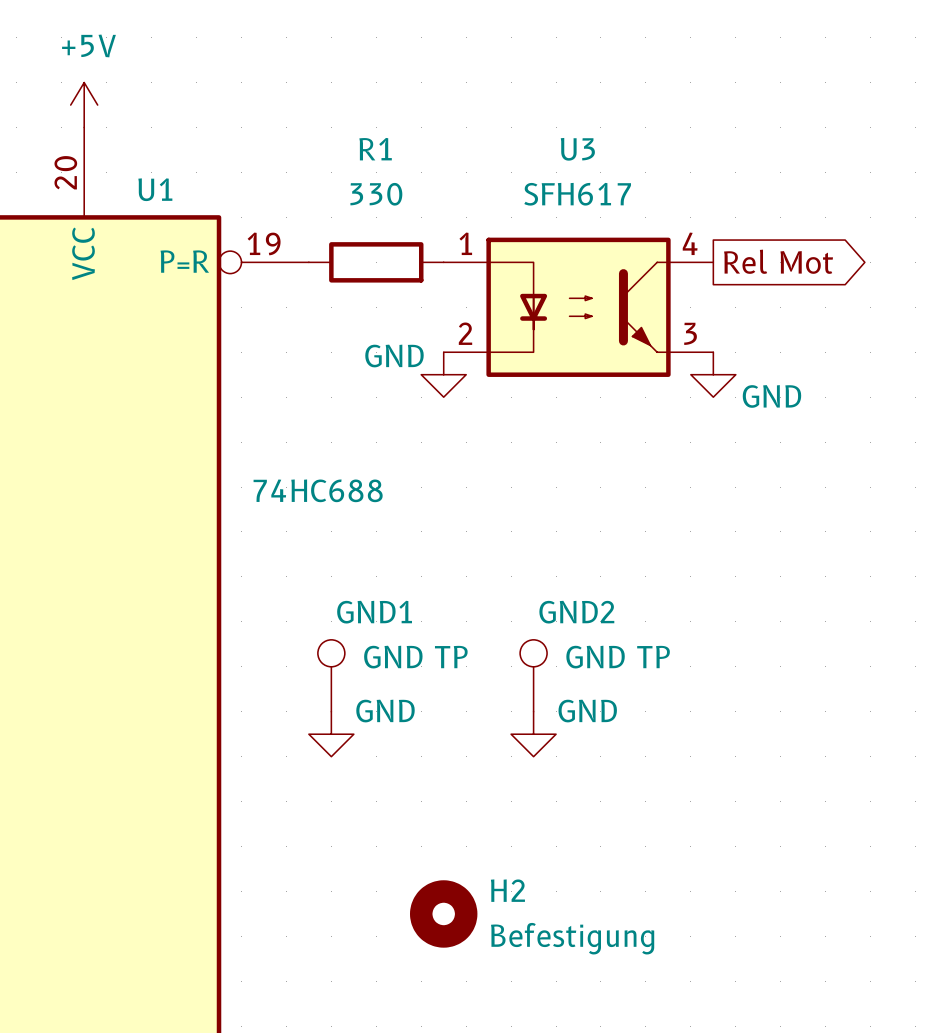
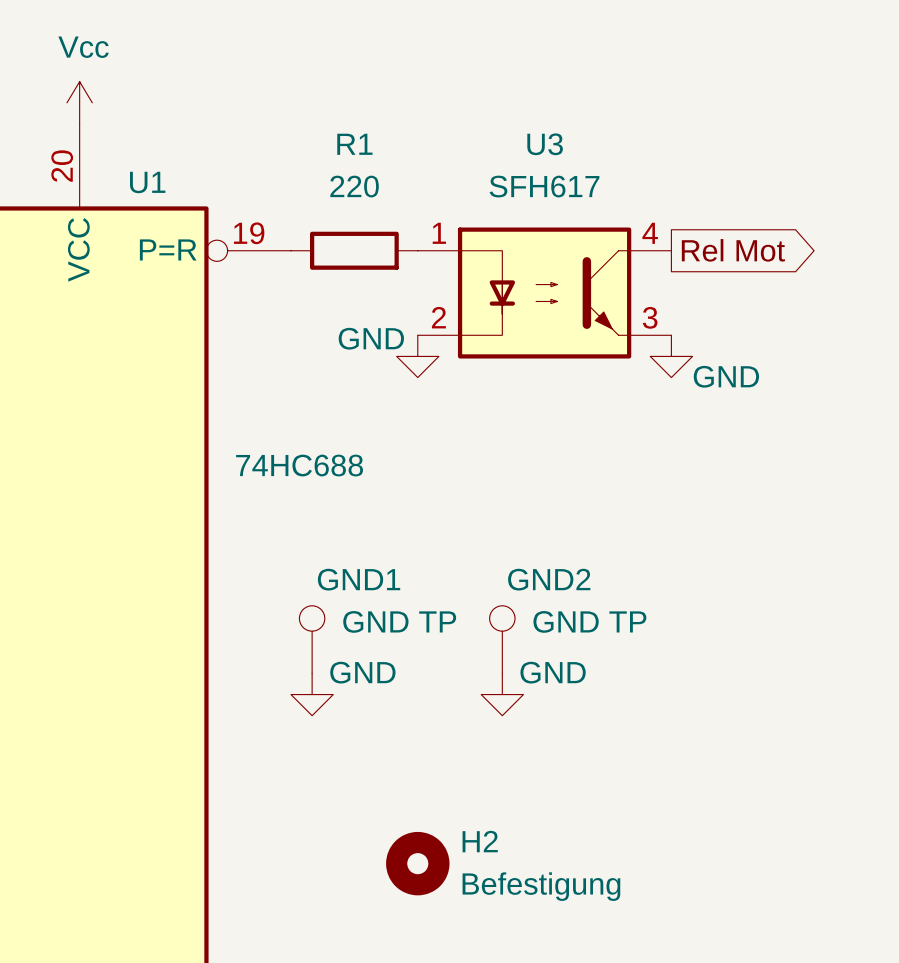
power symbol: +5V (84, 105) -> Vcc (79, 102)
R1 value: 330 (376, 194) -> 220 (354, 186)

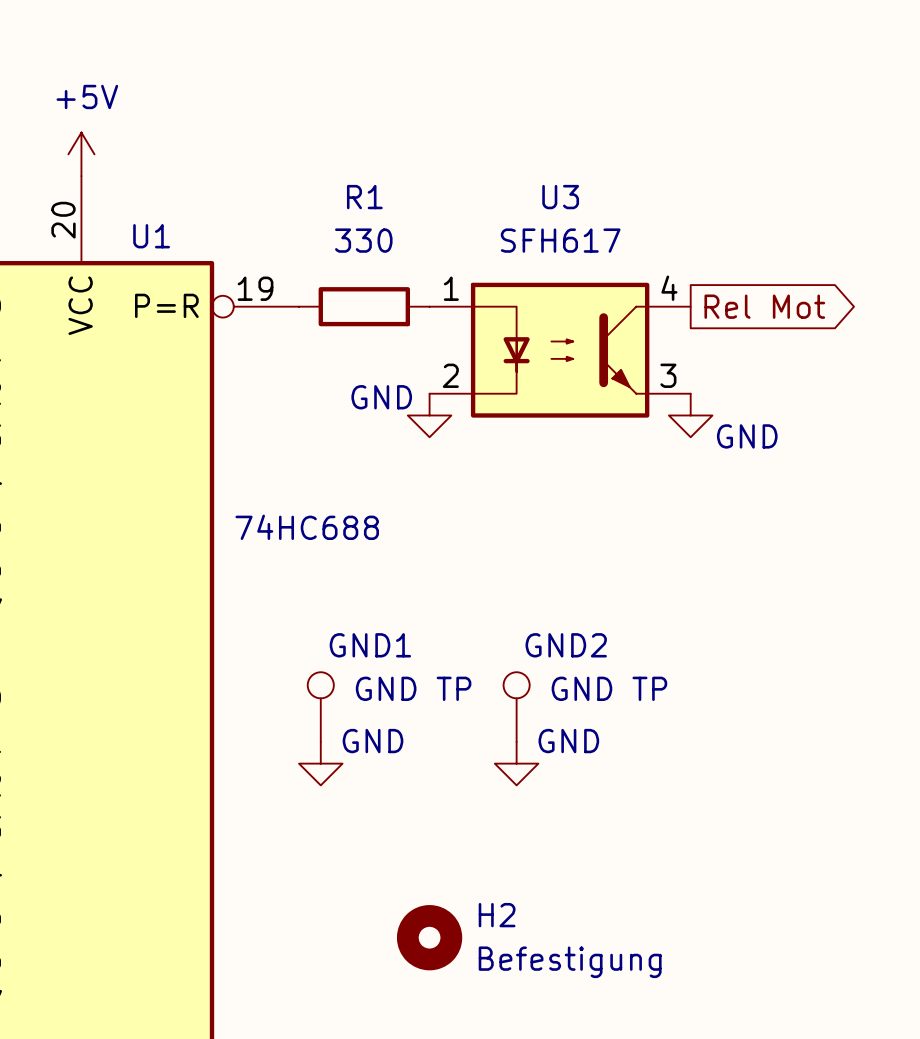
power symbol: Vcc (79, 102) -> +5V (81, 154)
R1 value: 220 (354, 186) -> 330 (363, 240)

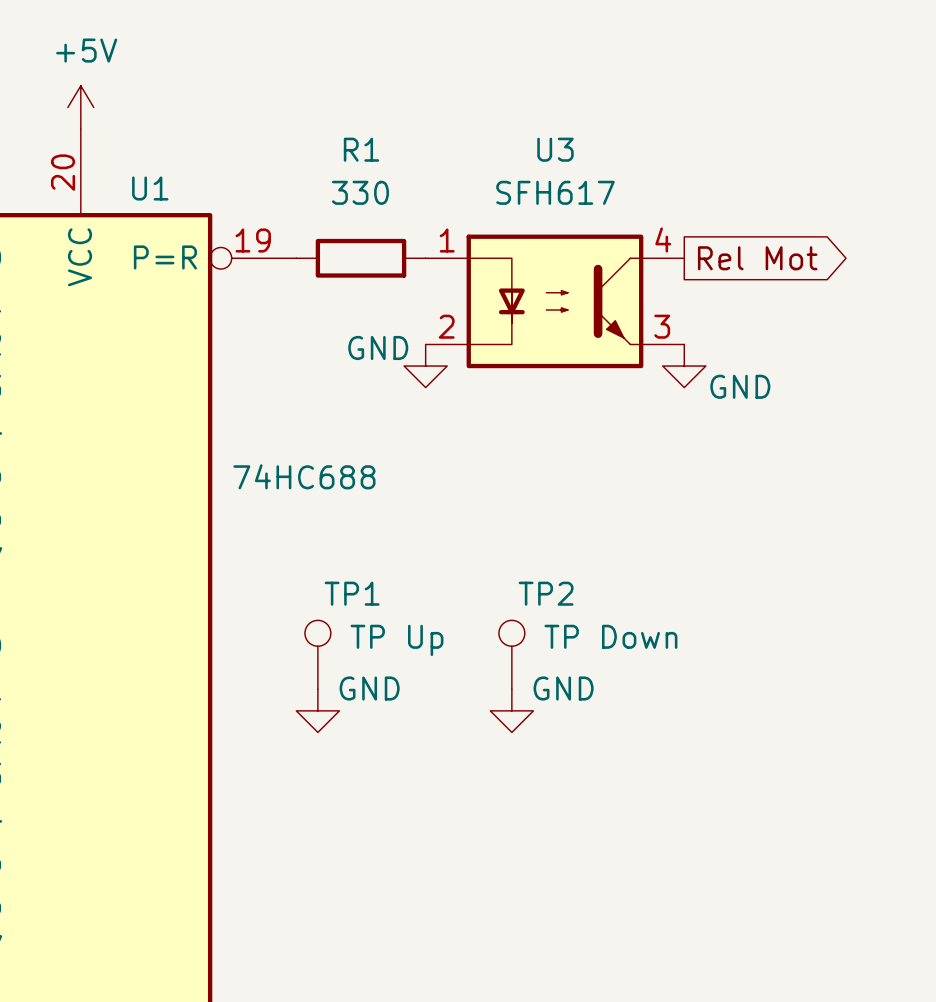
GND1 name: GND1 (370, 645) -> TP1 (352, 593)
GND2 name: GND2 (566, 645) -> TP2 (546, 593)
GND1 value: GND TP (413, 688) -> TP Up (396, 640)
GND2 value: GND TP (609, 688) -> TP Down (610, 636)
H2: Befestigung (429, 937) -> none

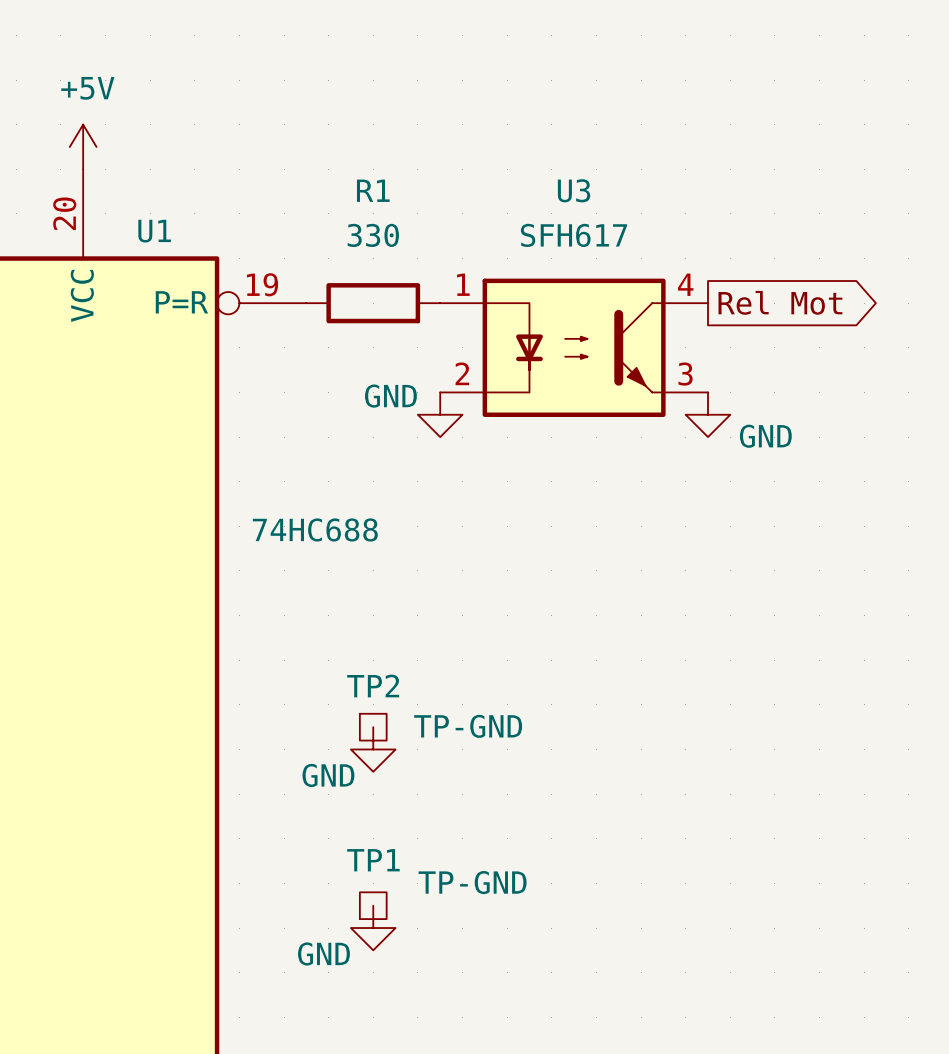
TP1 name position: TP1 (352, 593) -> TP1 (373, 860)
TP2 name position: TP2 (546, 593) -> TP2 (373, 685)
TP1 symbol: [304, 620, 331, 690] -> [359, 892, 387, 920]
TP2 symbol: [498, 620, 525, 690] -> [359, 713, 387, 741]
TP2 value: TP Down (610, 636) -> TP-GND (468, 726)
TP1 value: TP Up (396, 640) -> TP-GND (472, 882)
power symbol text position: GND (369, 688) -> GND (328, 775)
power symbol position: GND (317, 710) -> GND (373, 749)
power symbol: GND (511, 710) -> none
power symbol: none -> GND (373, 928)

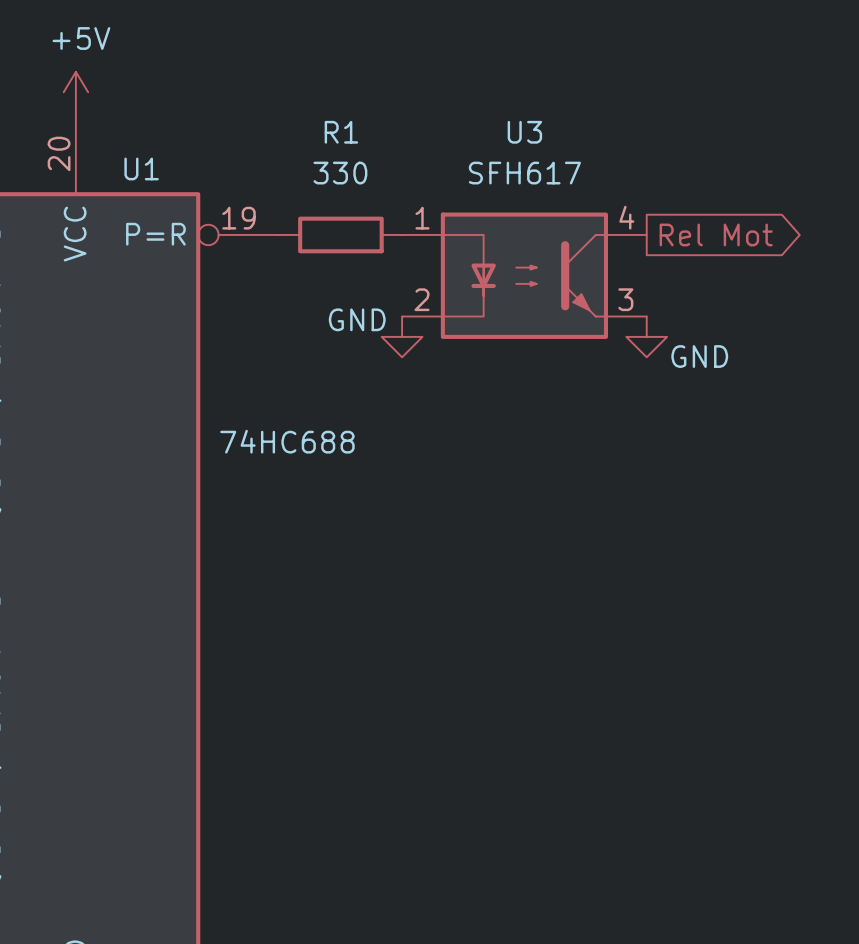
TP2: TP-GND (373, 727) -> none
power symbol: GND (373, 749) -> none
TP1: TP-GND (373, 905) -> none
power symbol: GND (373, 928) -> none

